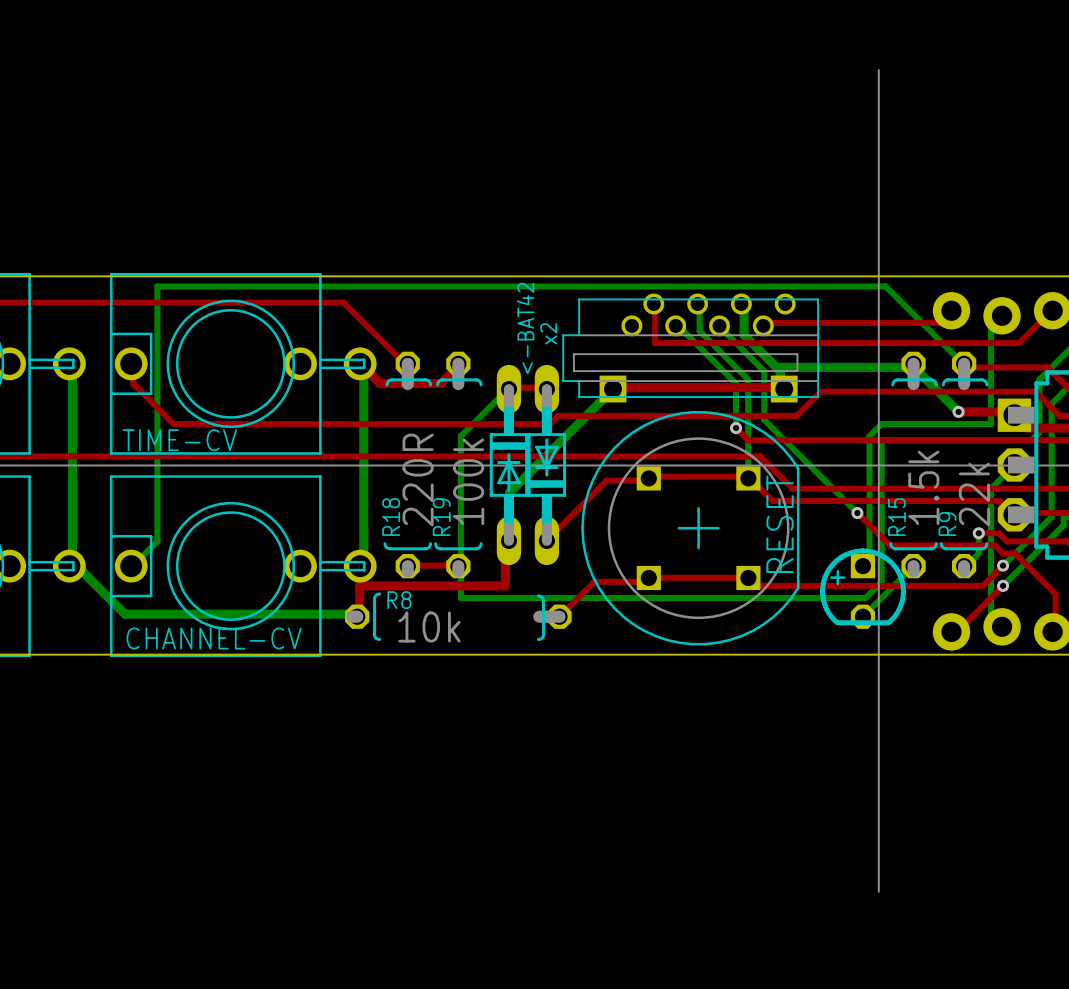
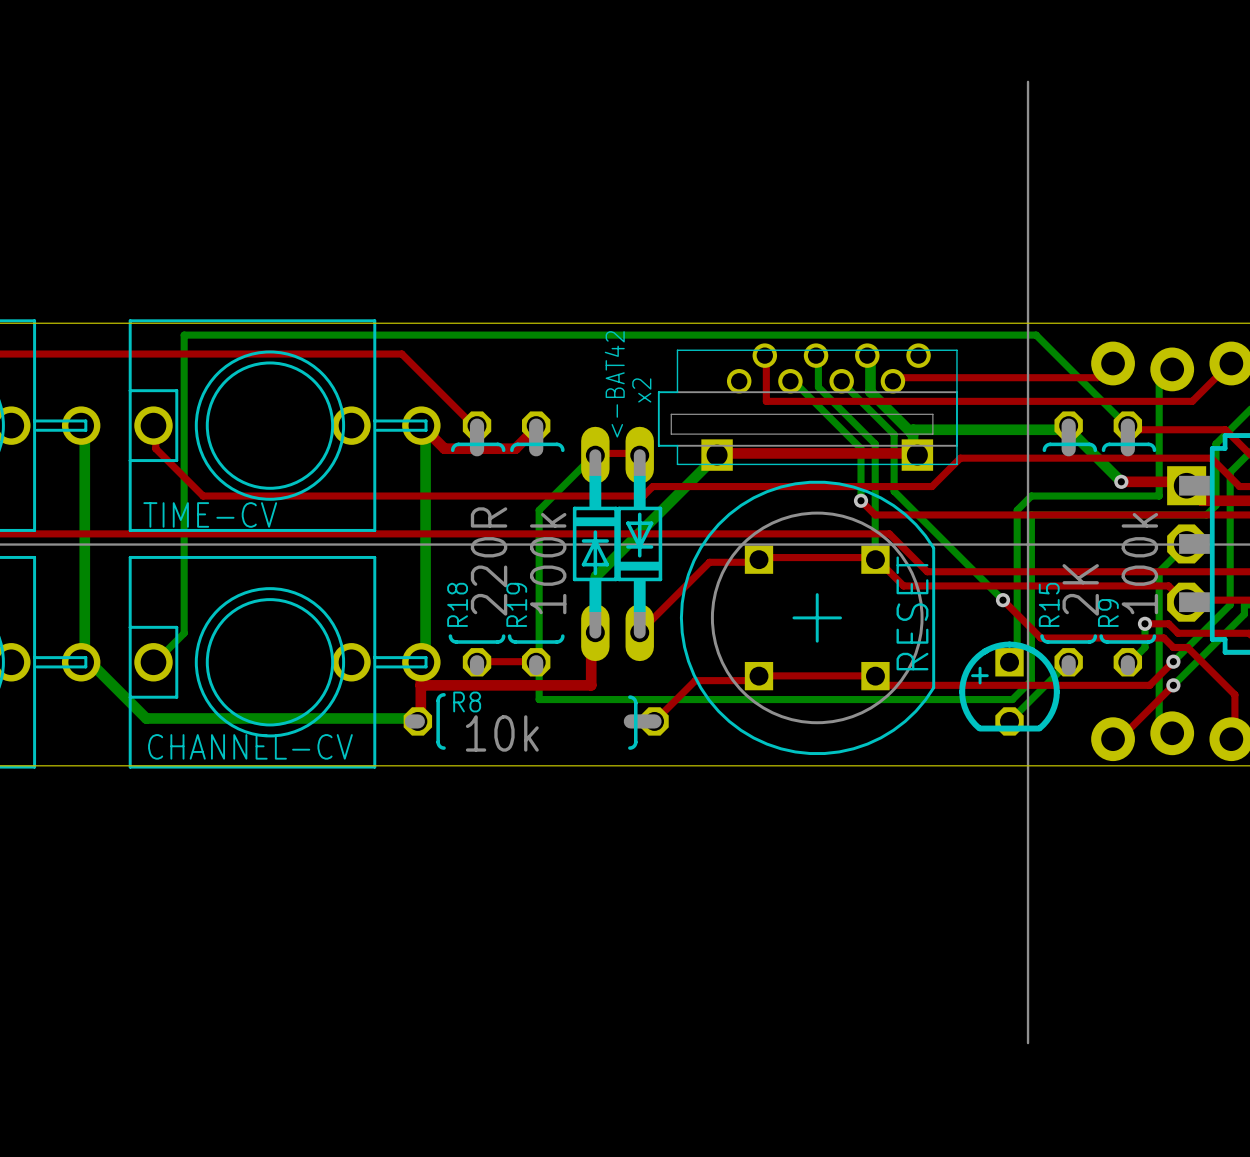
R15 value: 1.5k (923, 487) -> 2K (1080, 589)
R9 value: 22k (974, 494) -> 100k (1139, 563)

